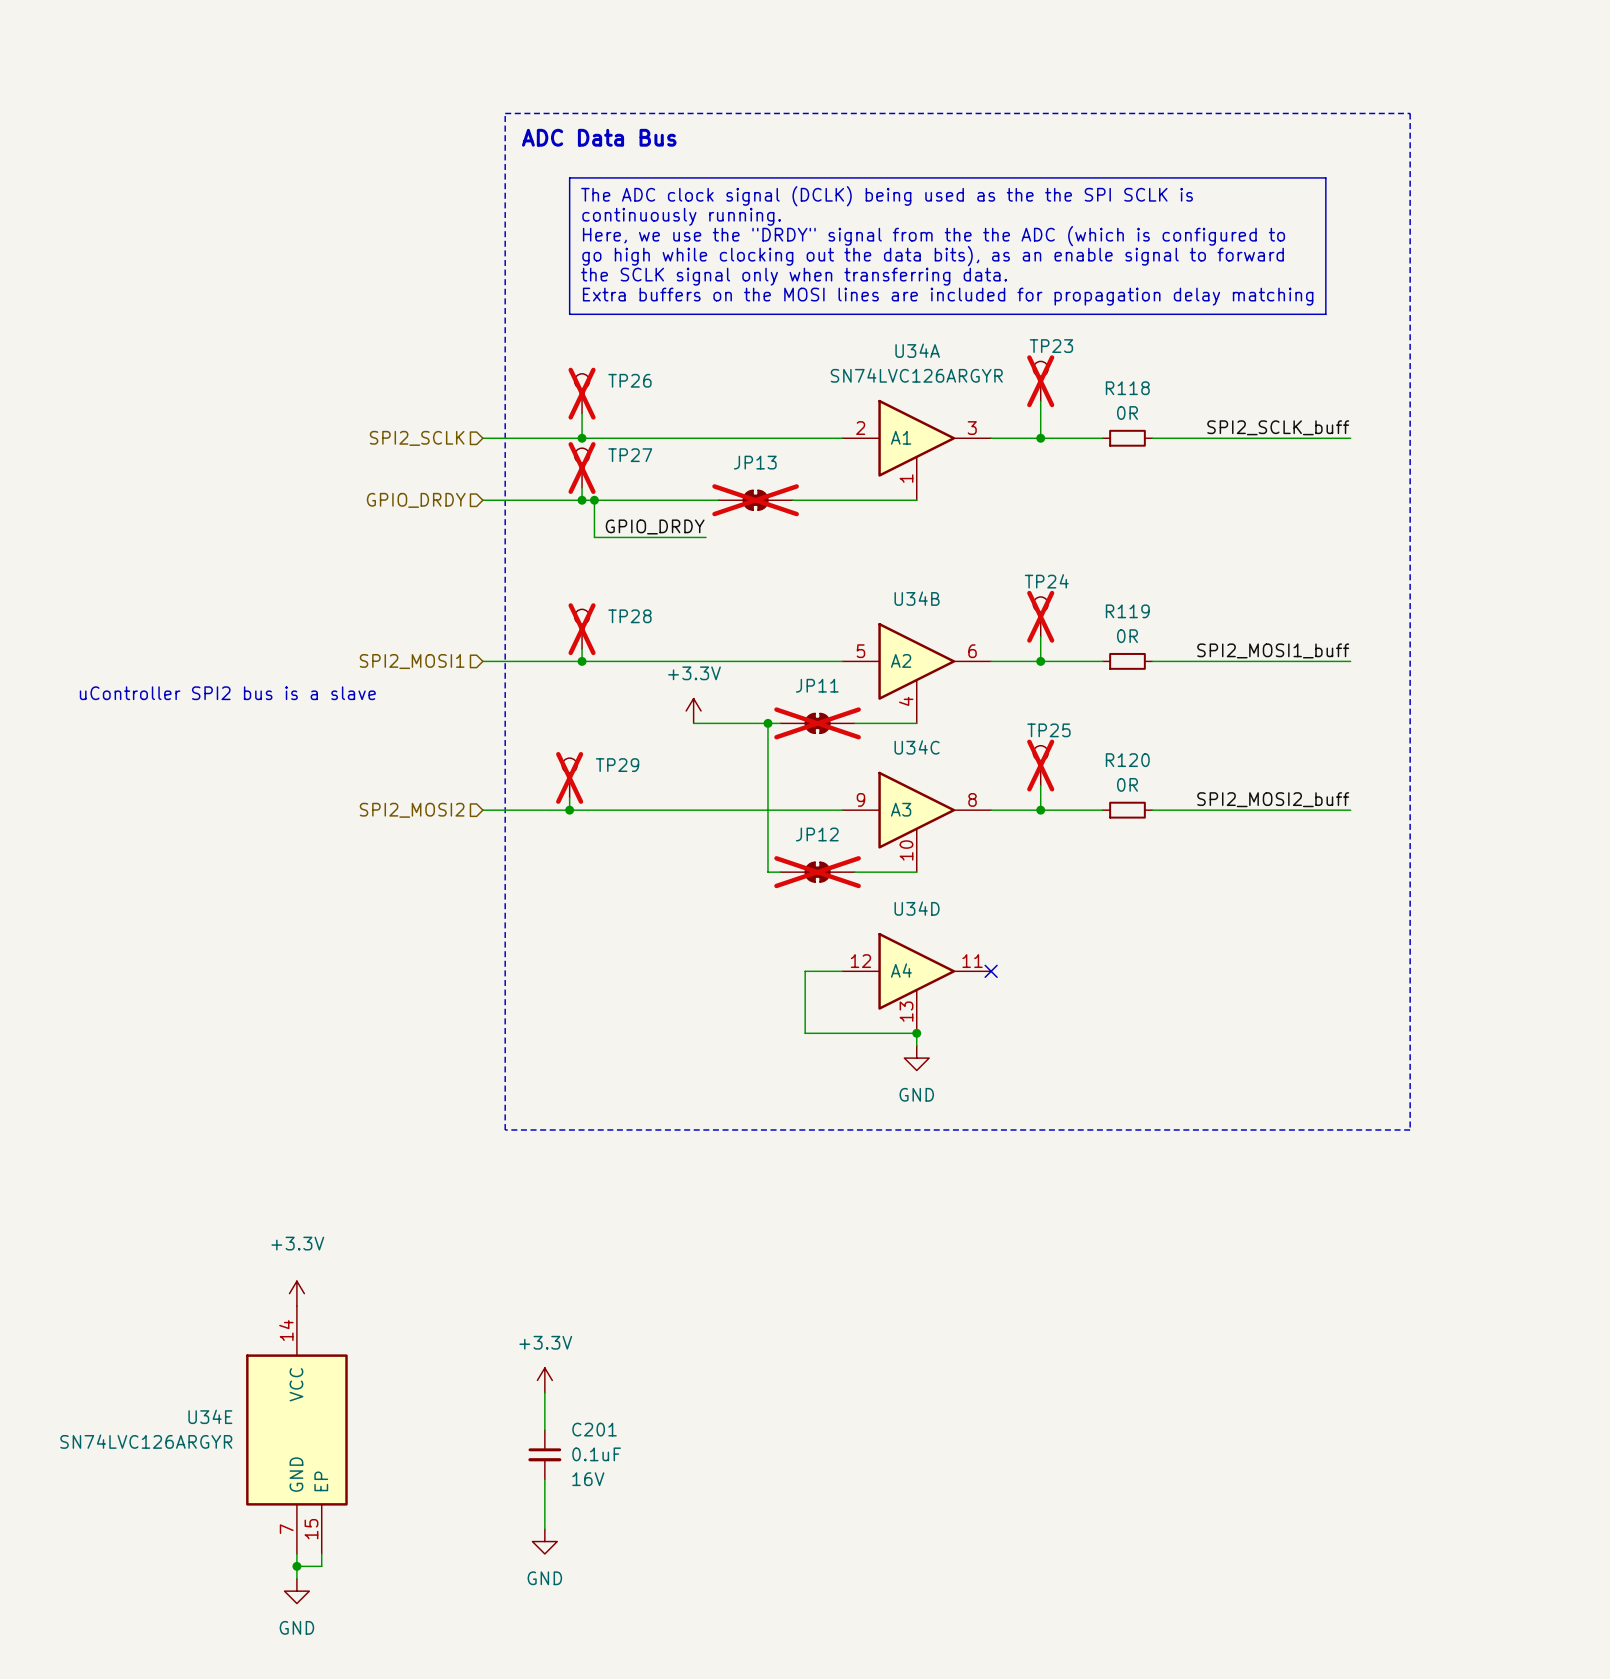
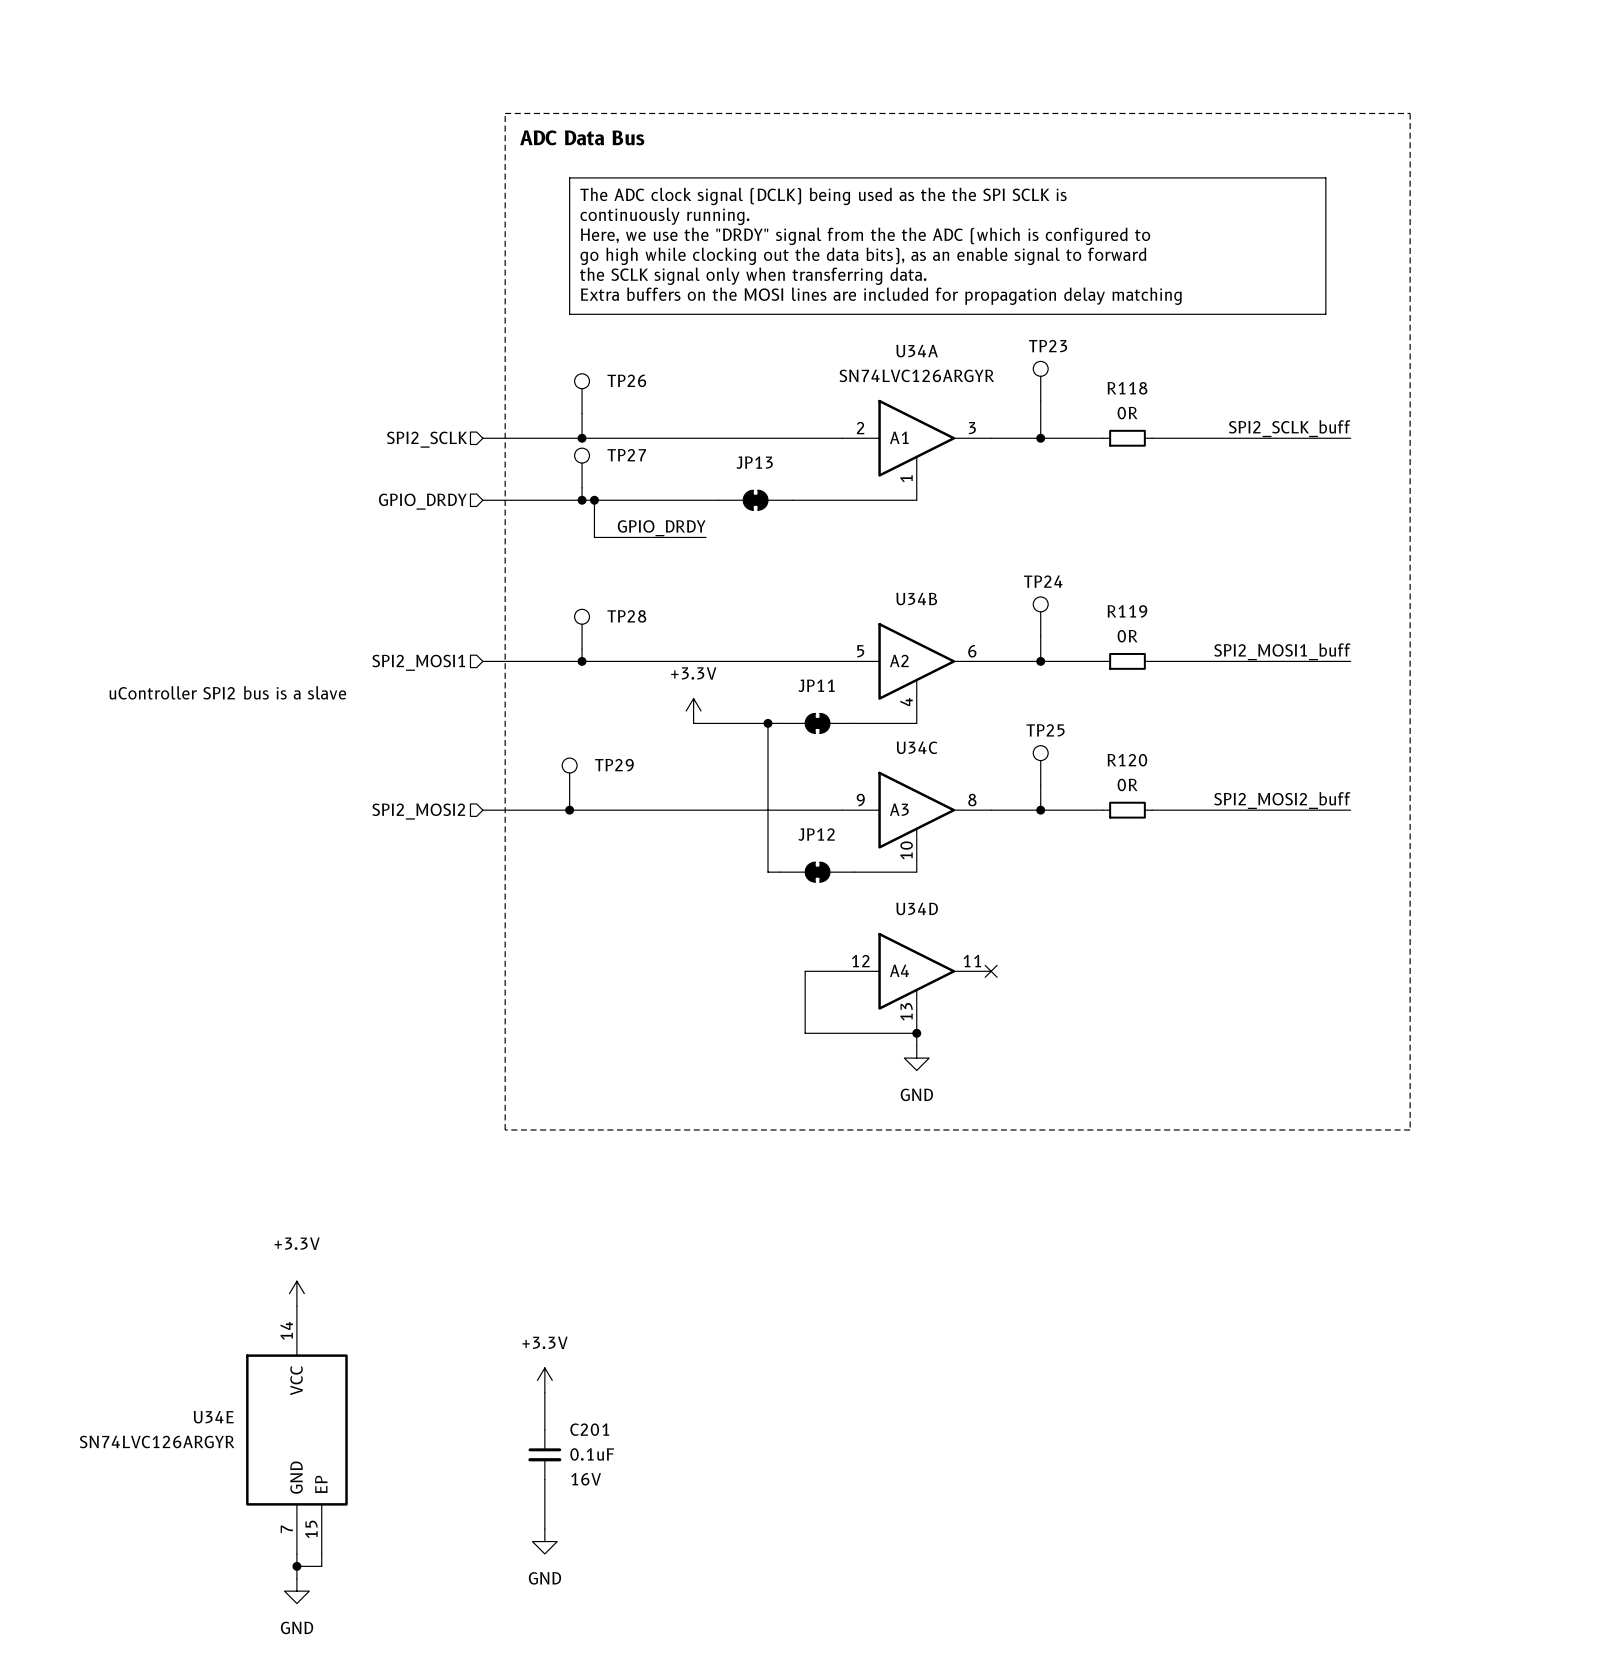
TP23 do-not-place cross: (1040, 381) -> none
TP26 do-not-place cross: (582, 393) -> none
TP27 do-not-place cross: (582, 468) -> none
JP13 do-not-place cross: (755, 500) -> none
TP24 do-not-place cross: (1040, 616) -> none
TP28 do-not-place cross: (582, 629) -> none
JP11 do-not-place cross: (817, 723) -> none
TP25 do-not-place cross: (1040, 765) -> none
TP29 do-not-place cross: (569, 777) -> none
JP12 do-not-place cross: (817, 872) -> none

